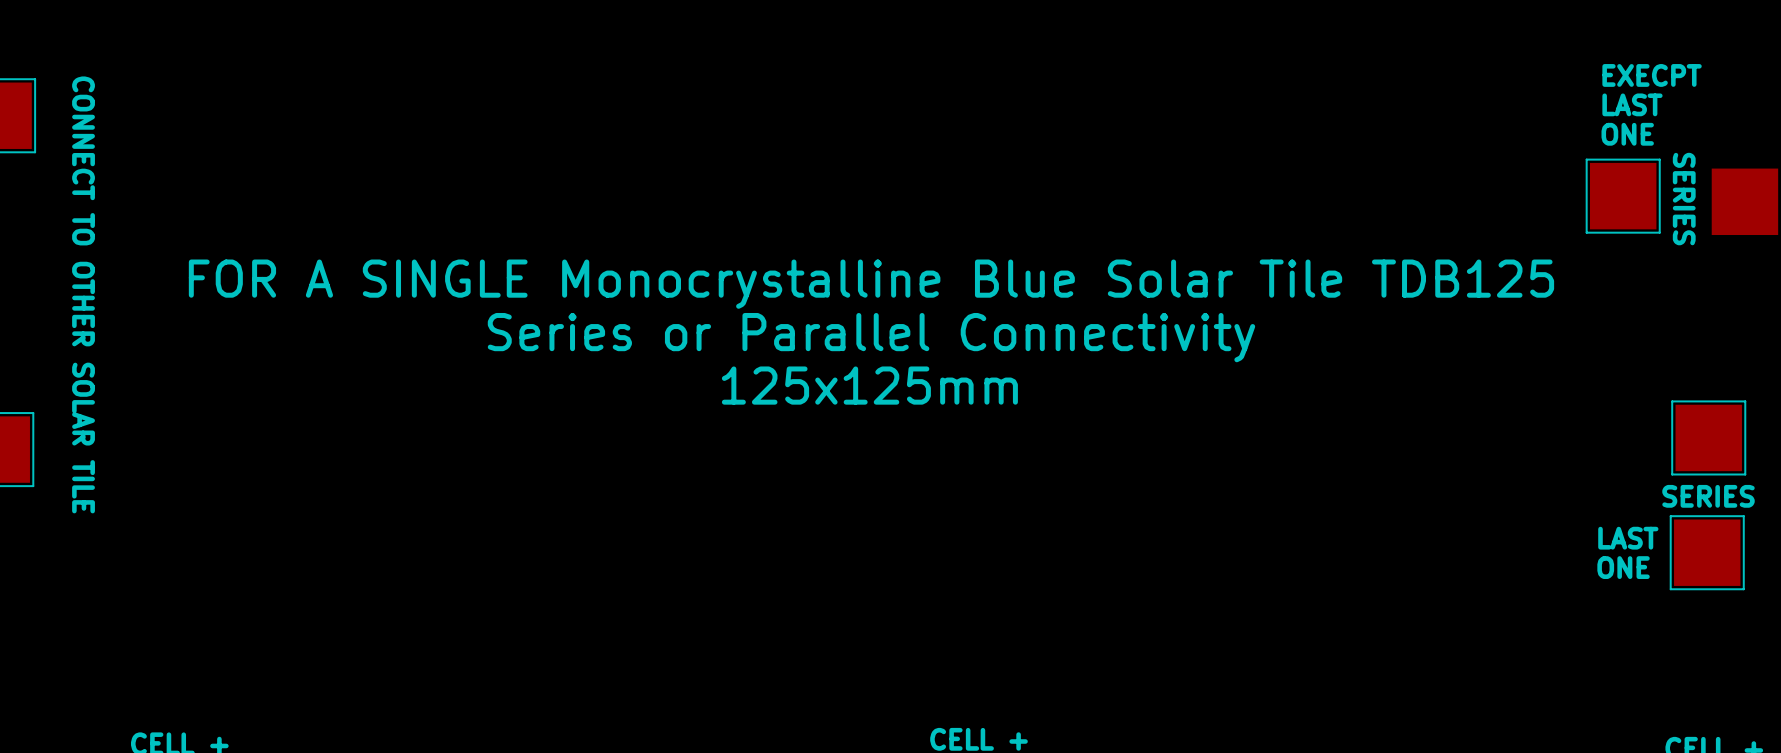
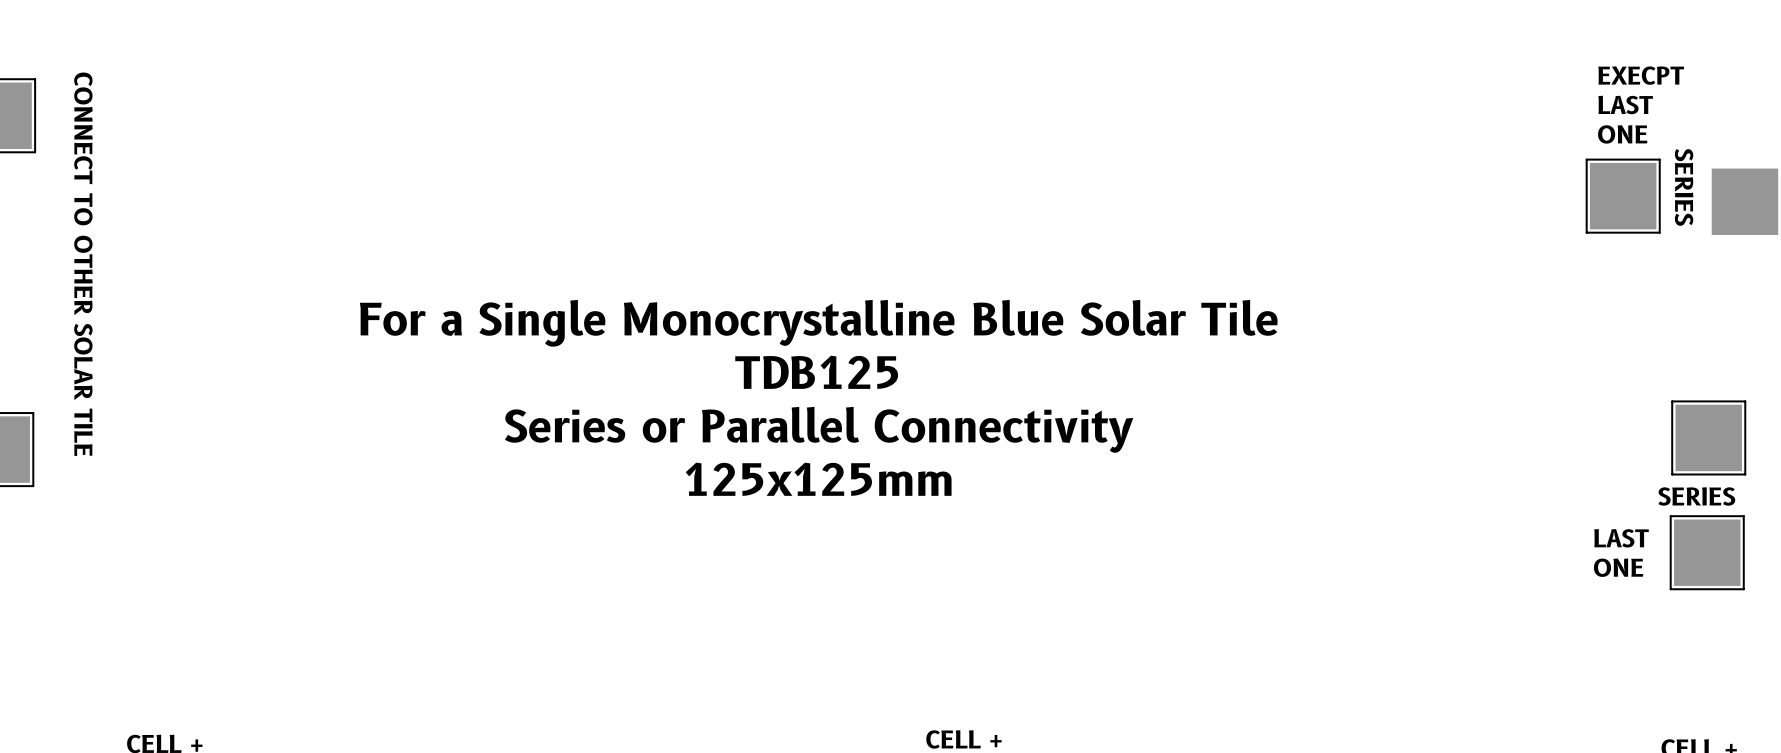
text: FOR A SINGLE Monocrystalline Blue Solar Tile TDB125 (871, 284) -> For a Single Monocrystalline Blue Solar Tile (818, 323)
text position: Series or Parallel Connectivity (871, 337) -> Series or Parallel Connectivity (819, 429)
text: none -> TDB125 (816, 372)
text position: 125x125mm (869, 385) -> 125x125mm (818, 479)

